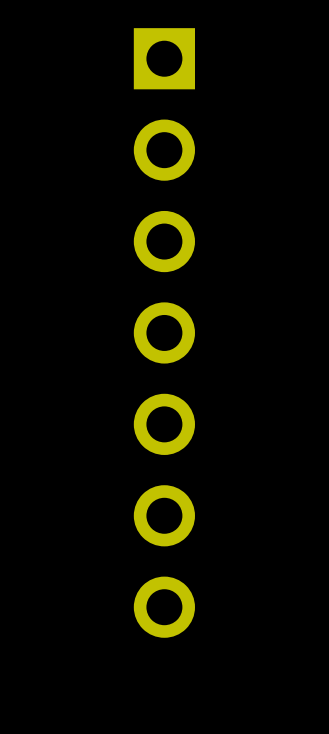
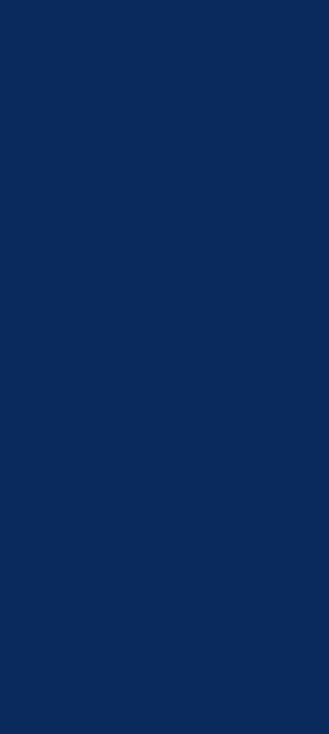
part: (164, 332) -> none

